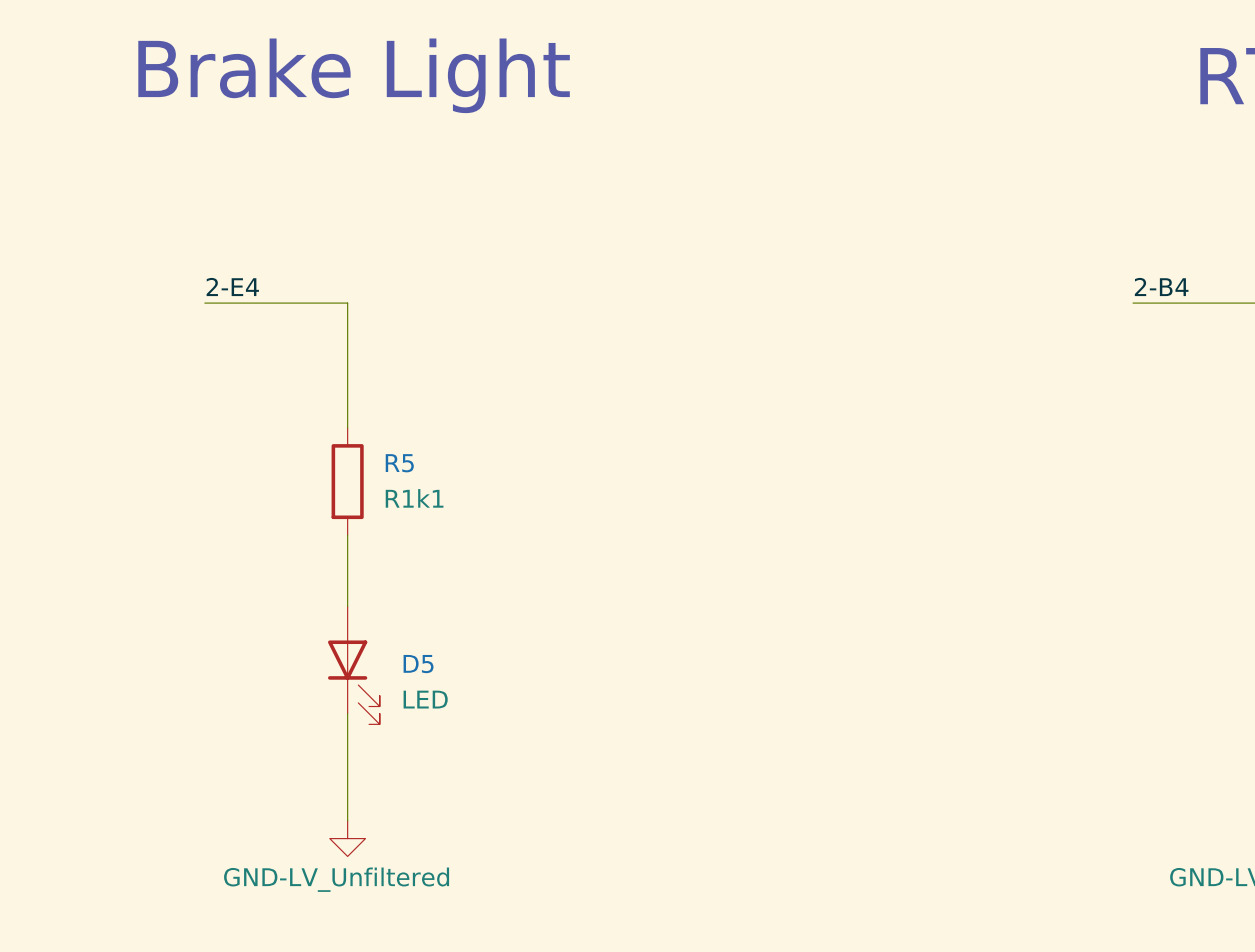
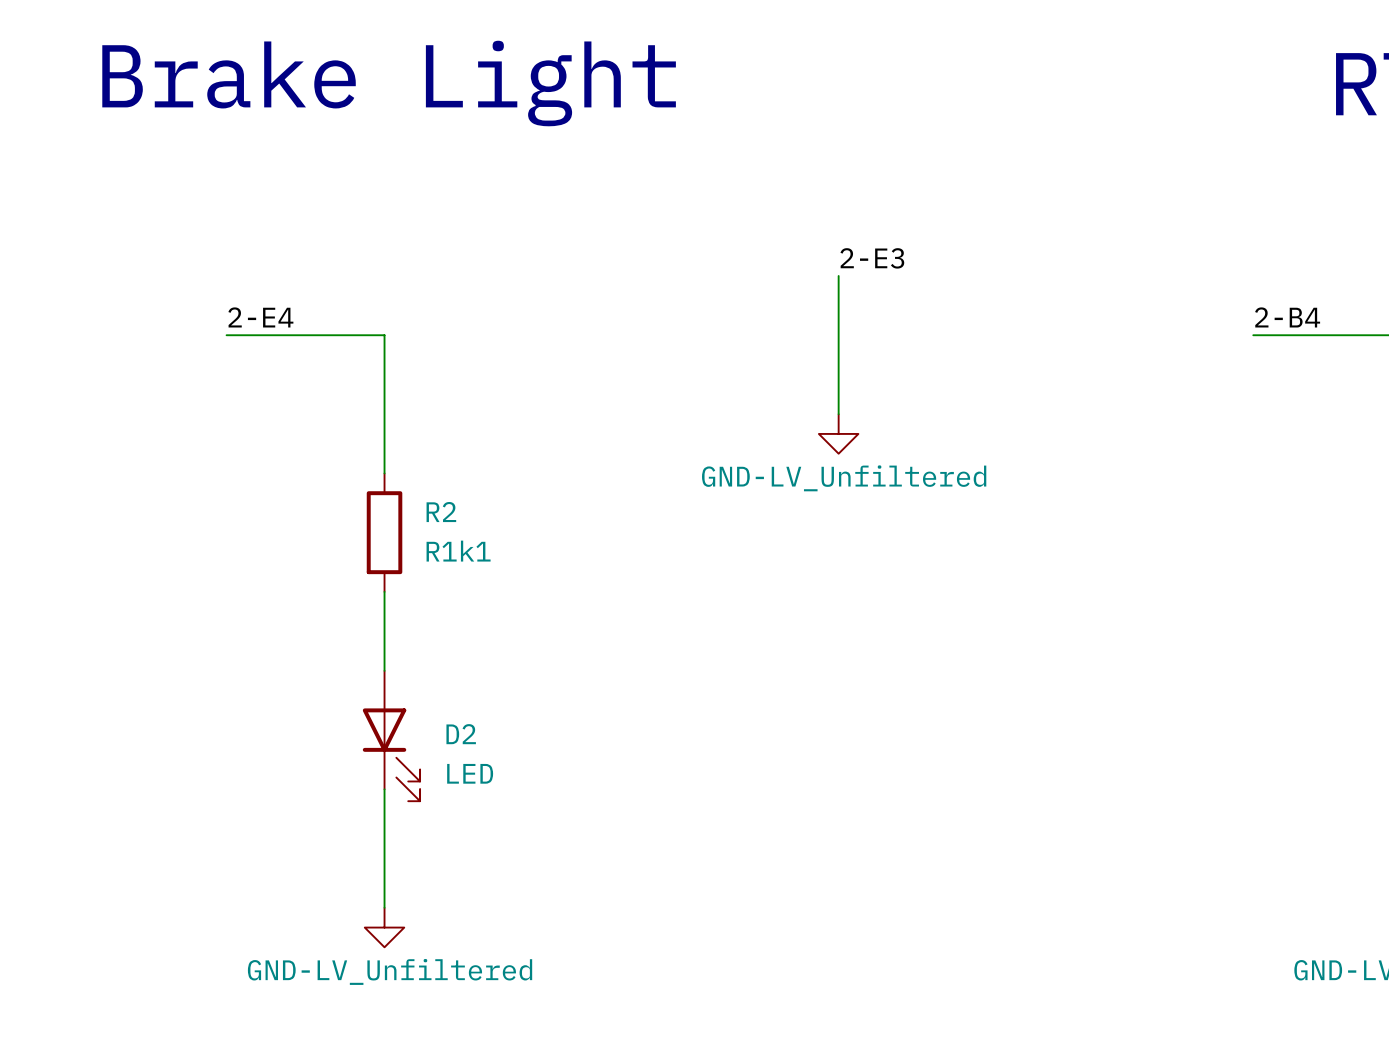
label: none -> 2-E3 (872, 258)
wire: none -> (838, 276) (838, 414)
power symbol: none -> GND-LV_Unfiltered (838, 433)
R5 name: R5 (399, 463) -> R2 (441, 512)
D5 name: D5 (418, 664) -> D2 (461, 734)

